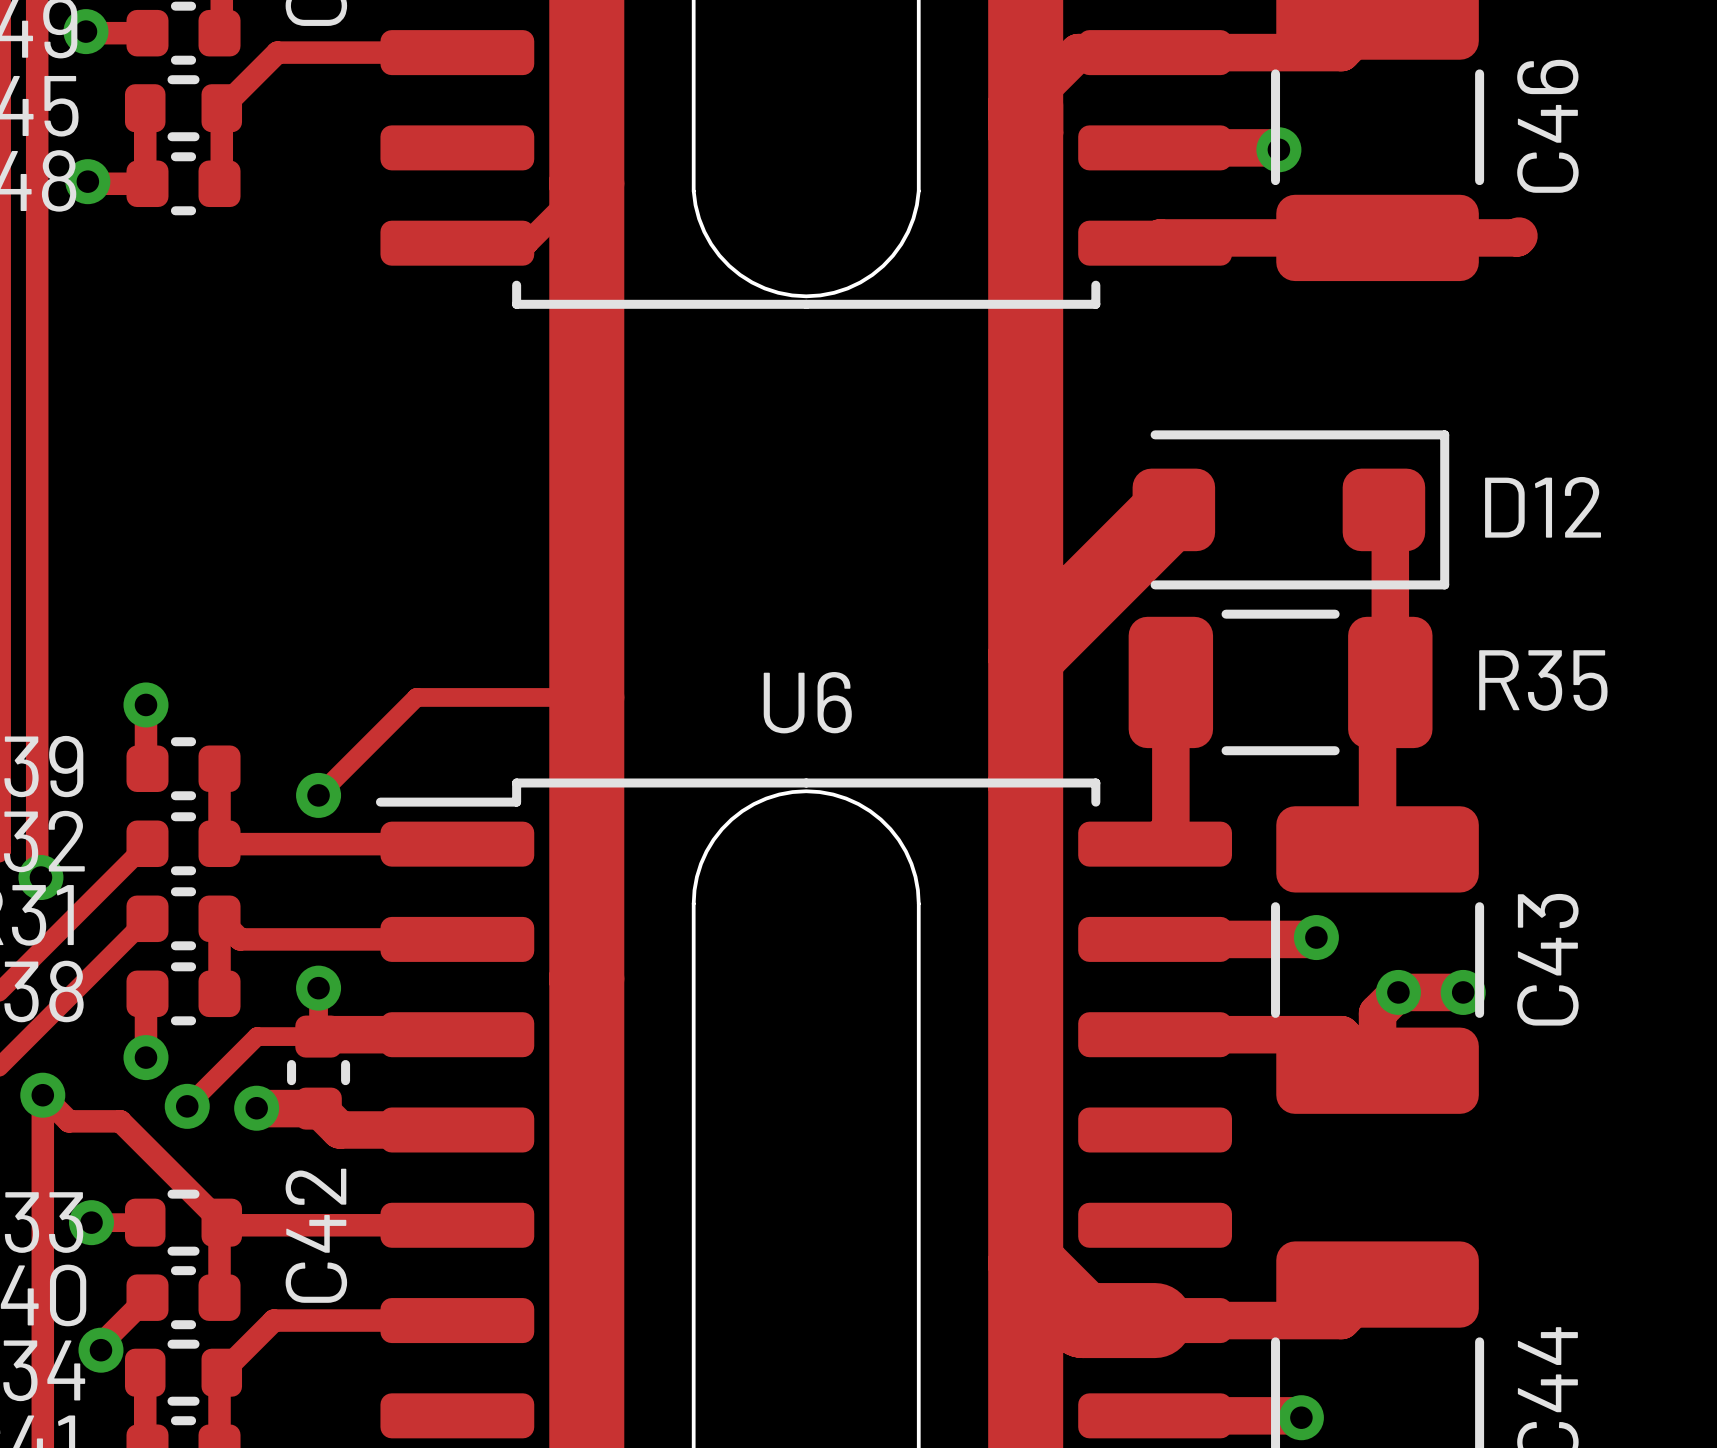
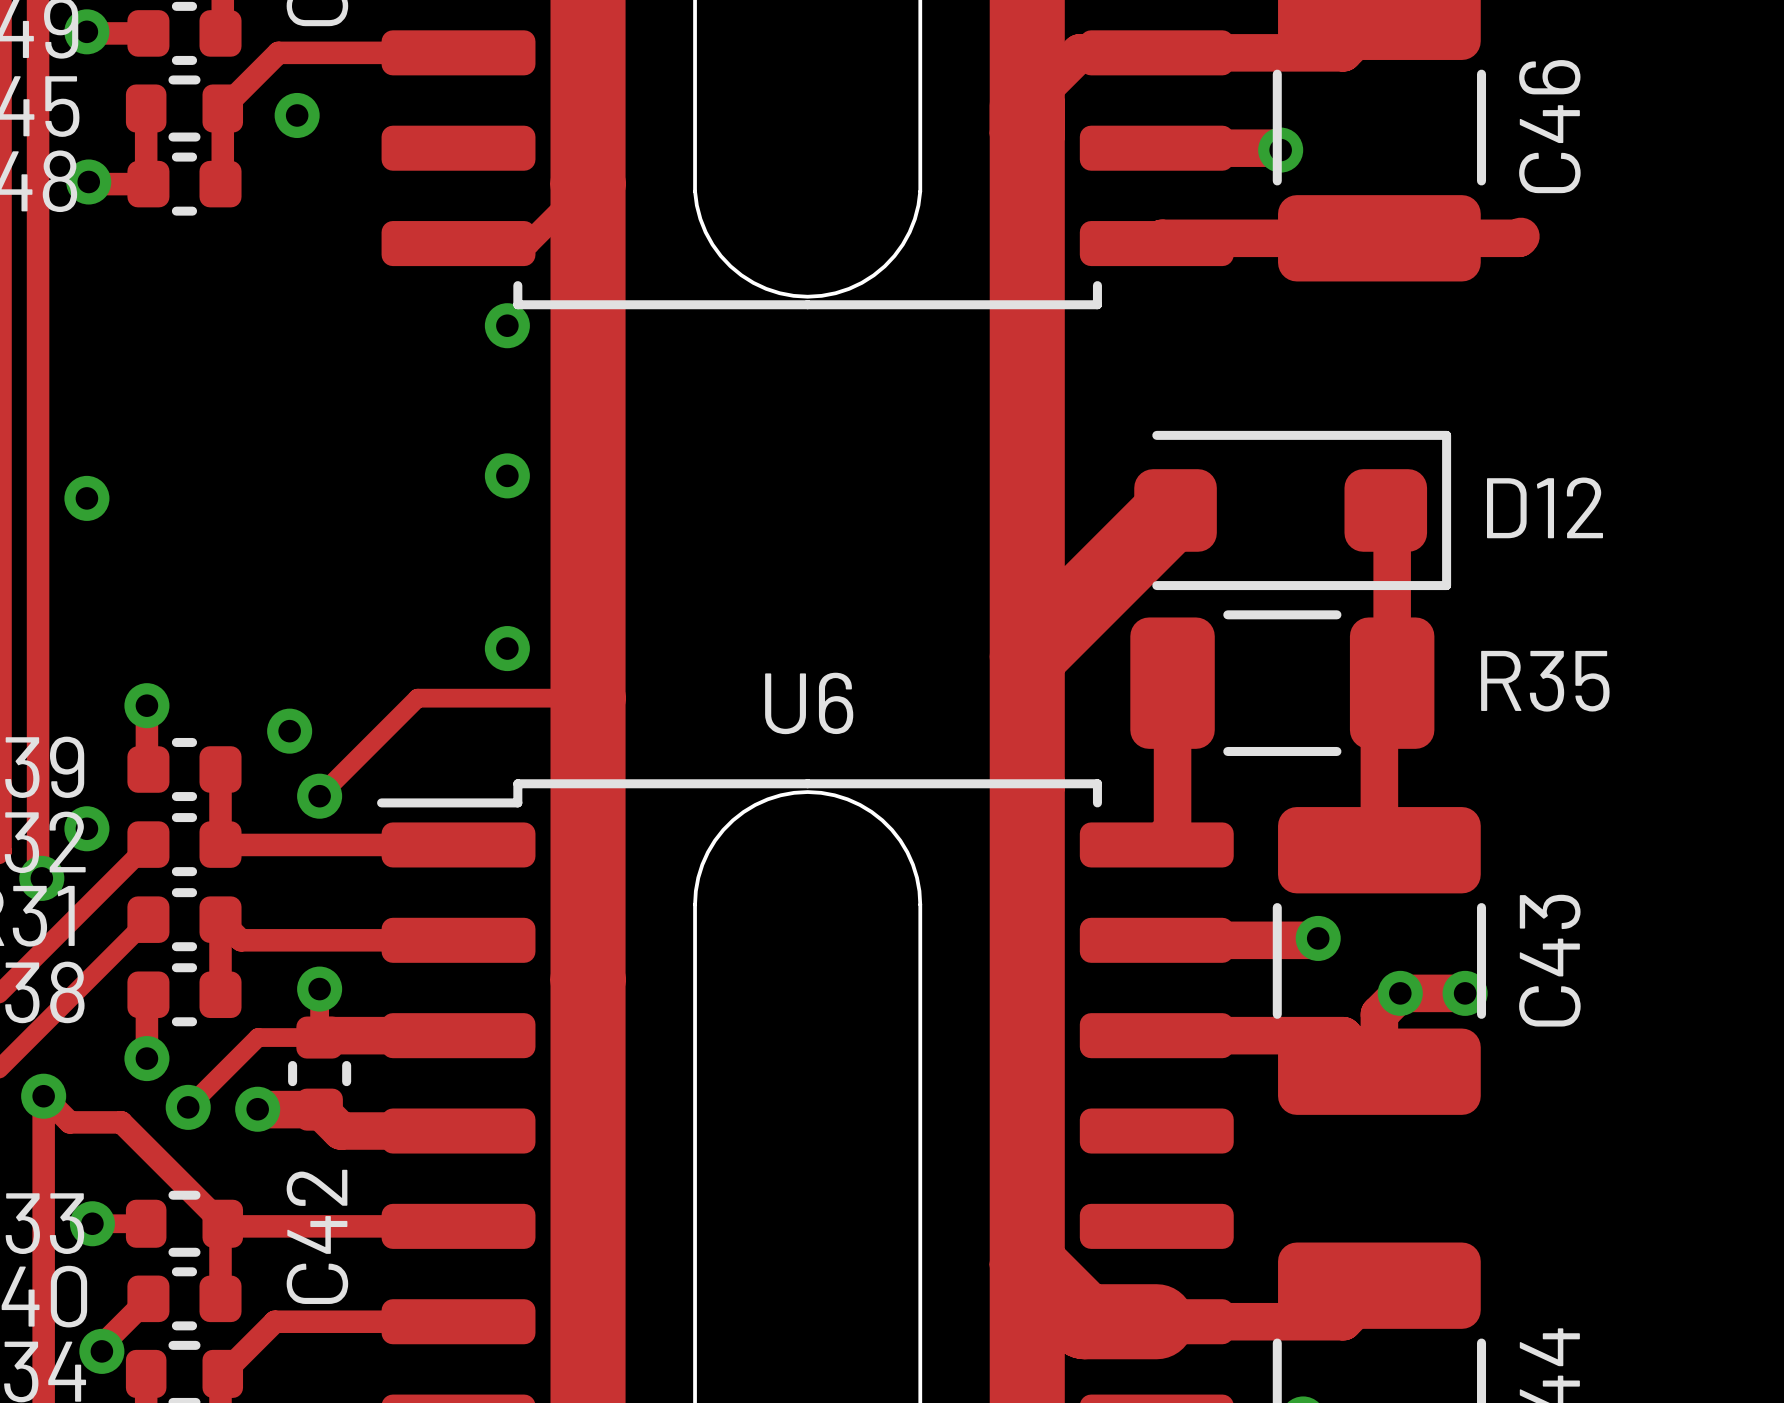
via: none -> (297, 115)
via: none -> (507, 325)
via: none -> (507, 475)
via: none -> (86, 498)
via: none -> (507, 648)
via: none -> (289, 731)
via: none -> (86, 828)

